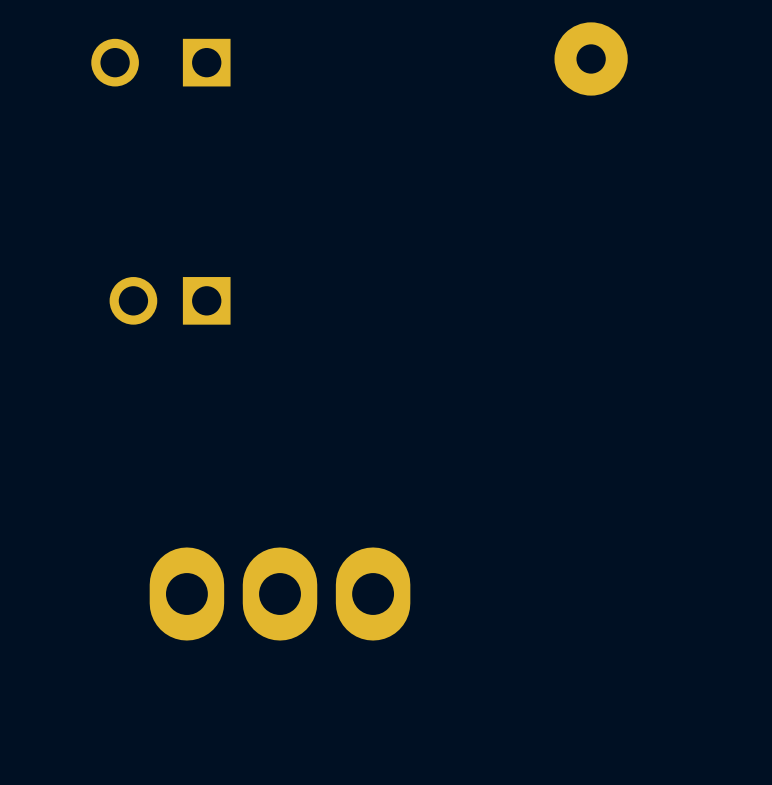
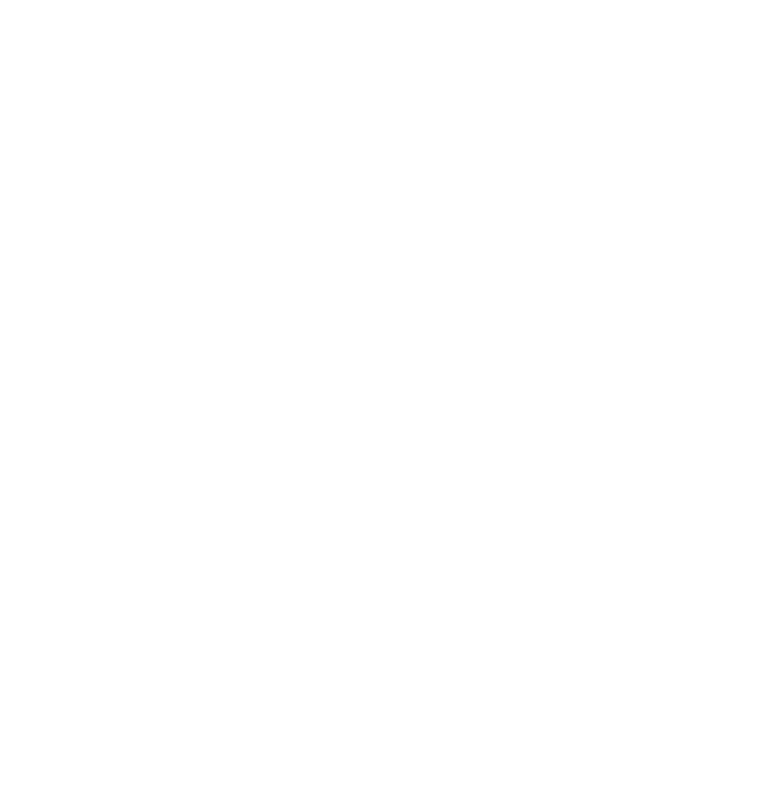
part: (591, 58) -> none
part: (160, 62) -> none
part: (170, 300) -> none
part: (280, 594) -> none

